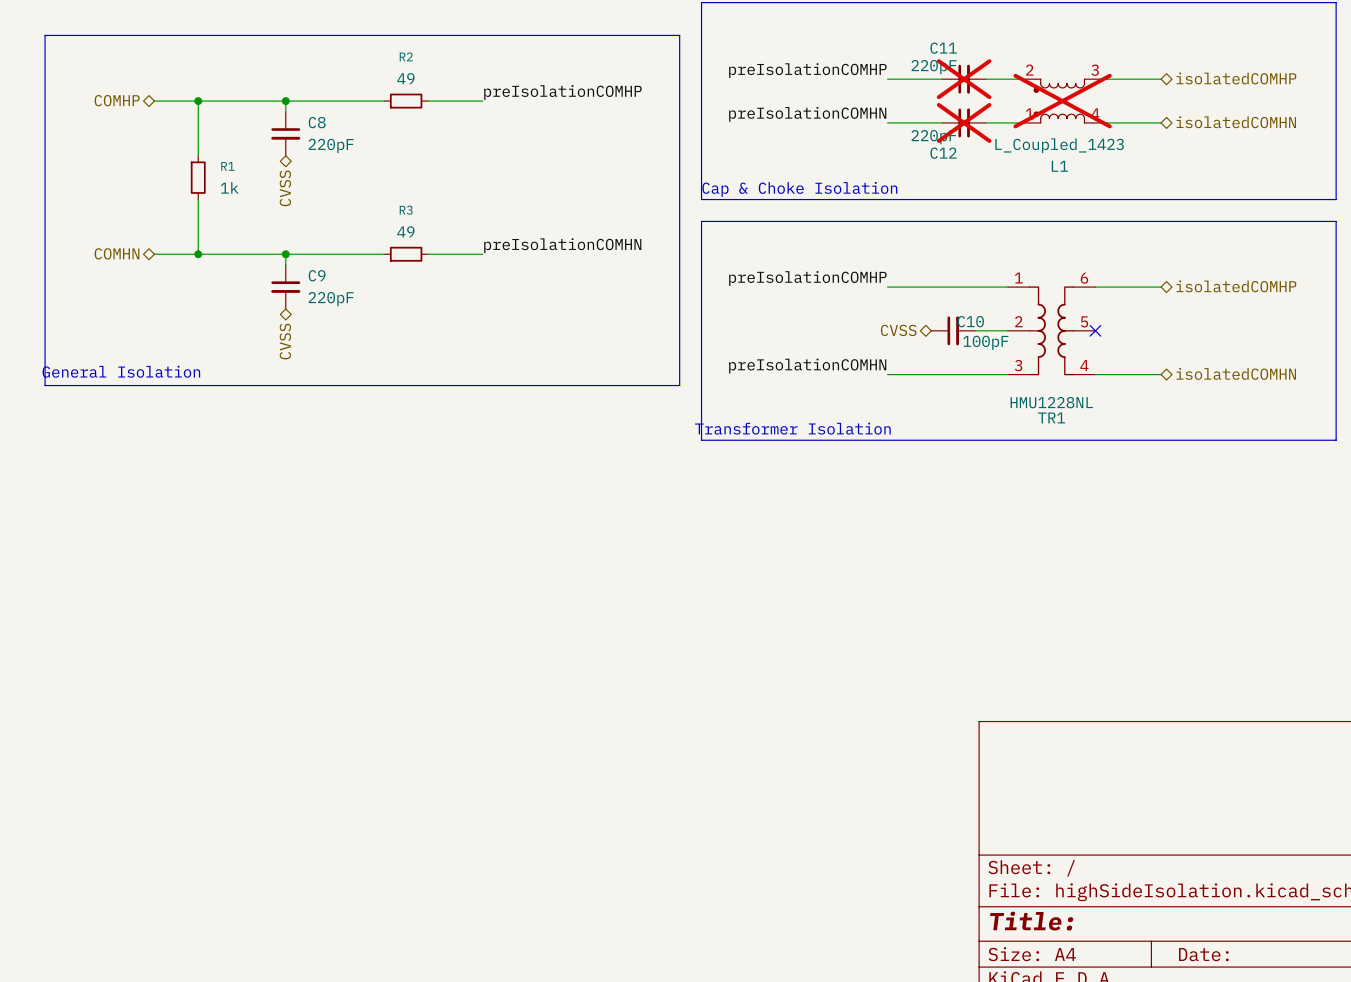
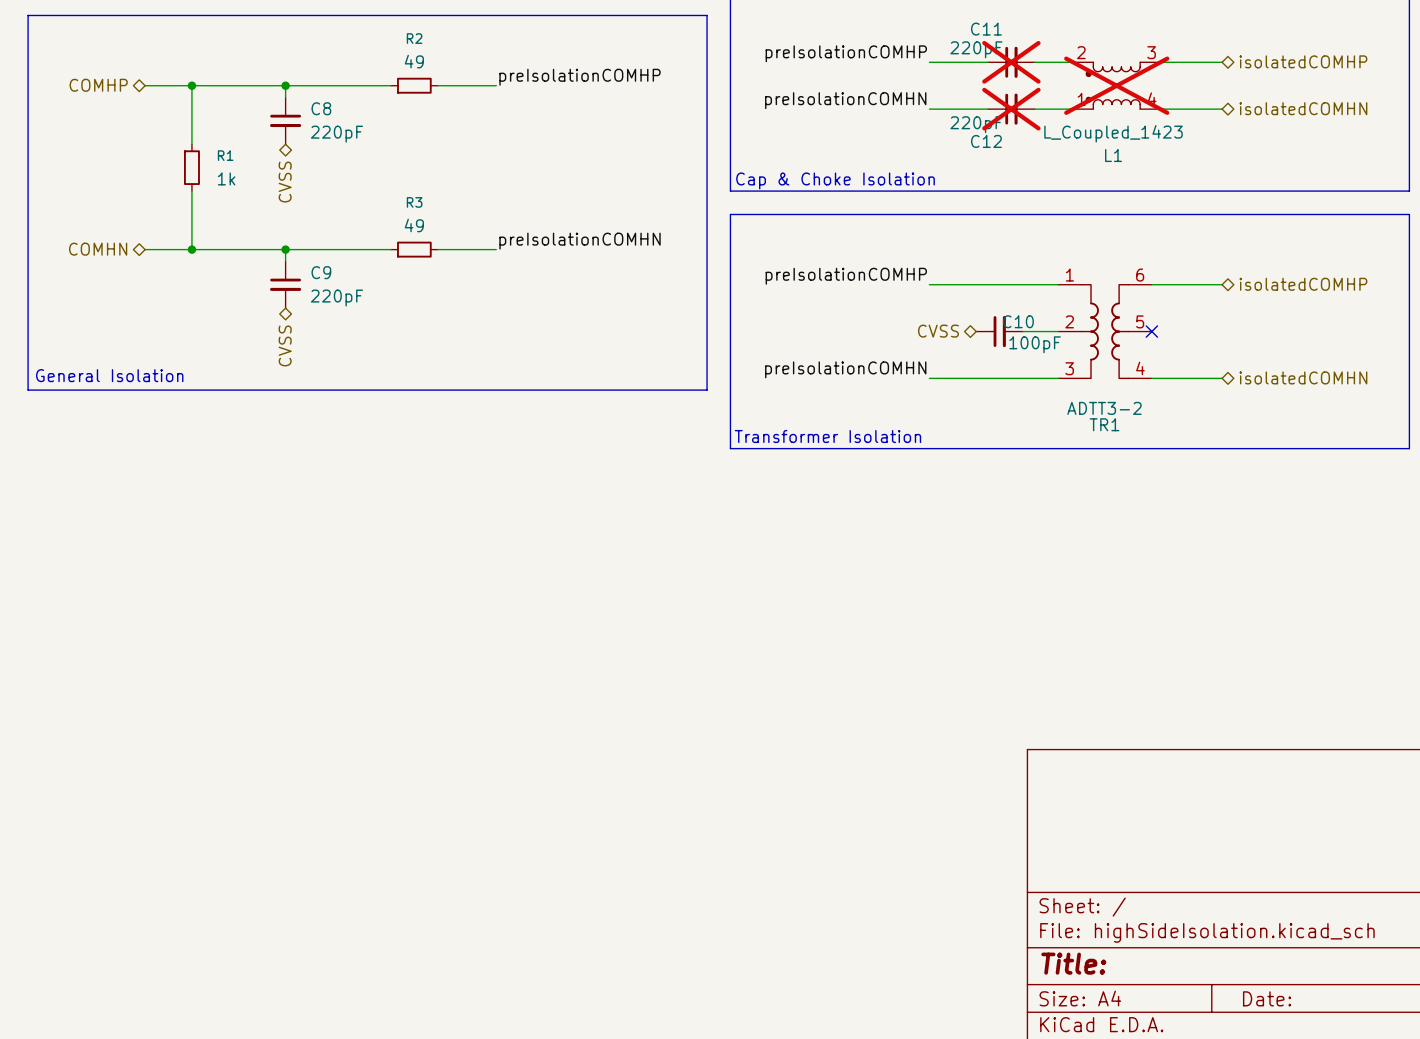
TR1 value: HMU1228NL (1051, 402) -> ADTT3-2 (1104, 408)

